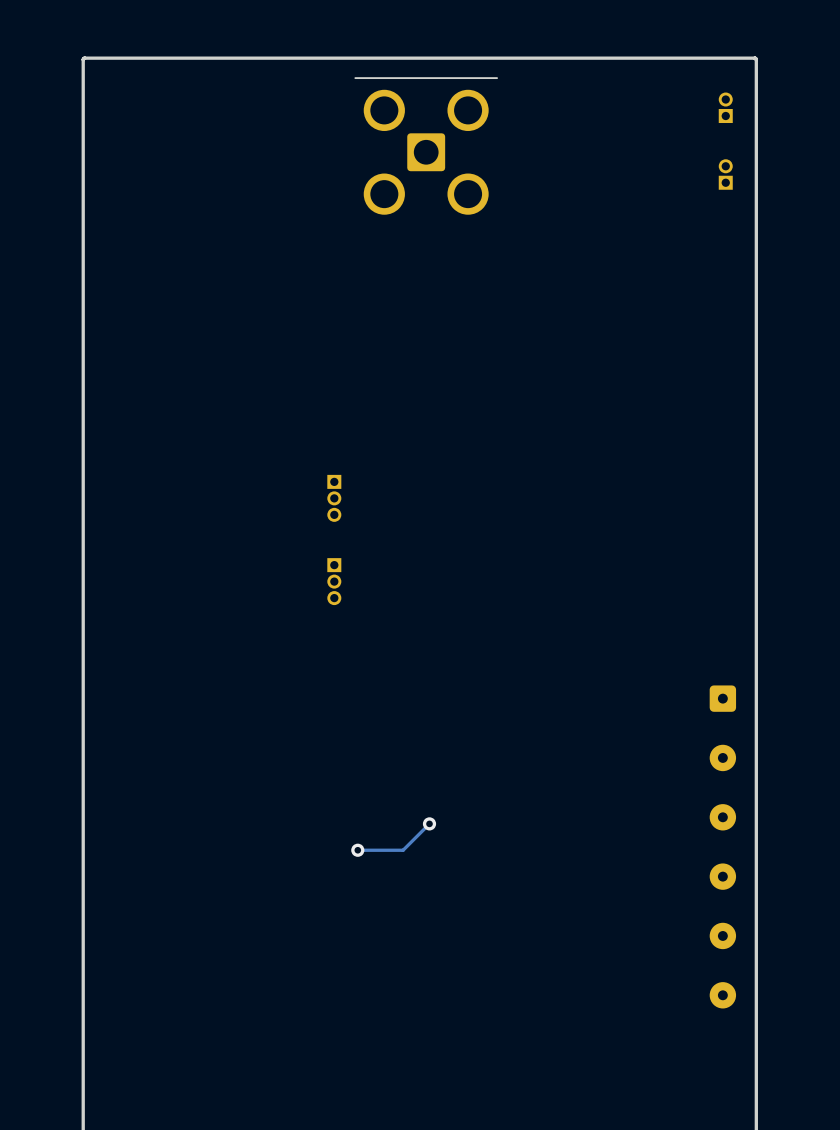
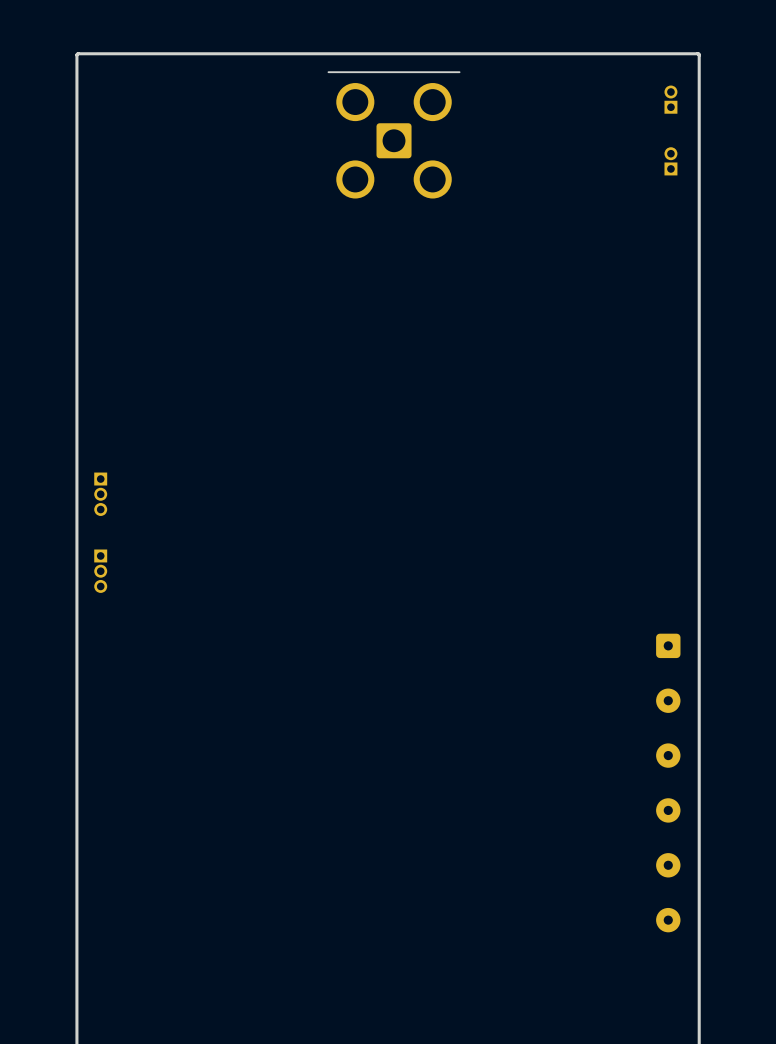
part: (334, 498) -> none
part: none -> (100, 494)
part: (334, 581) -> none
part: none -> (100, 571)
track: (429, 823) (403, 850) (357, 850) -> none
via: (429, 823) -> none
via: (357, 850) -> none

